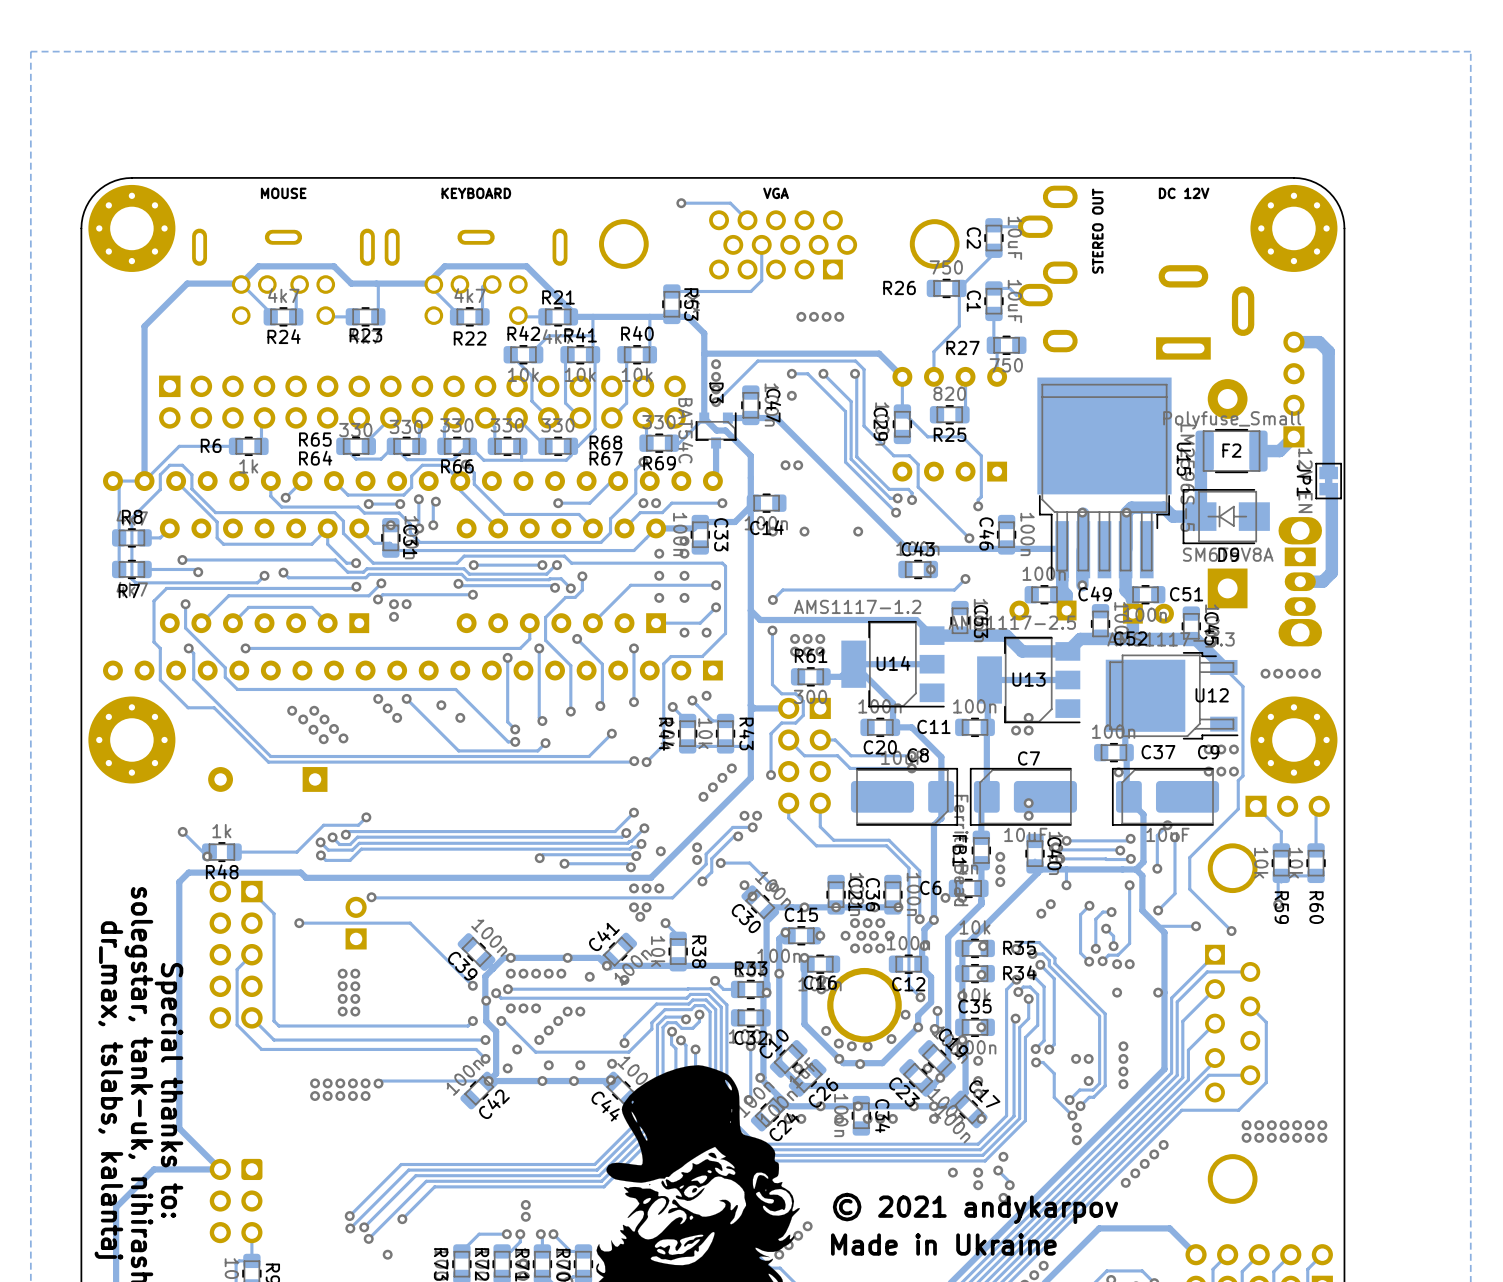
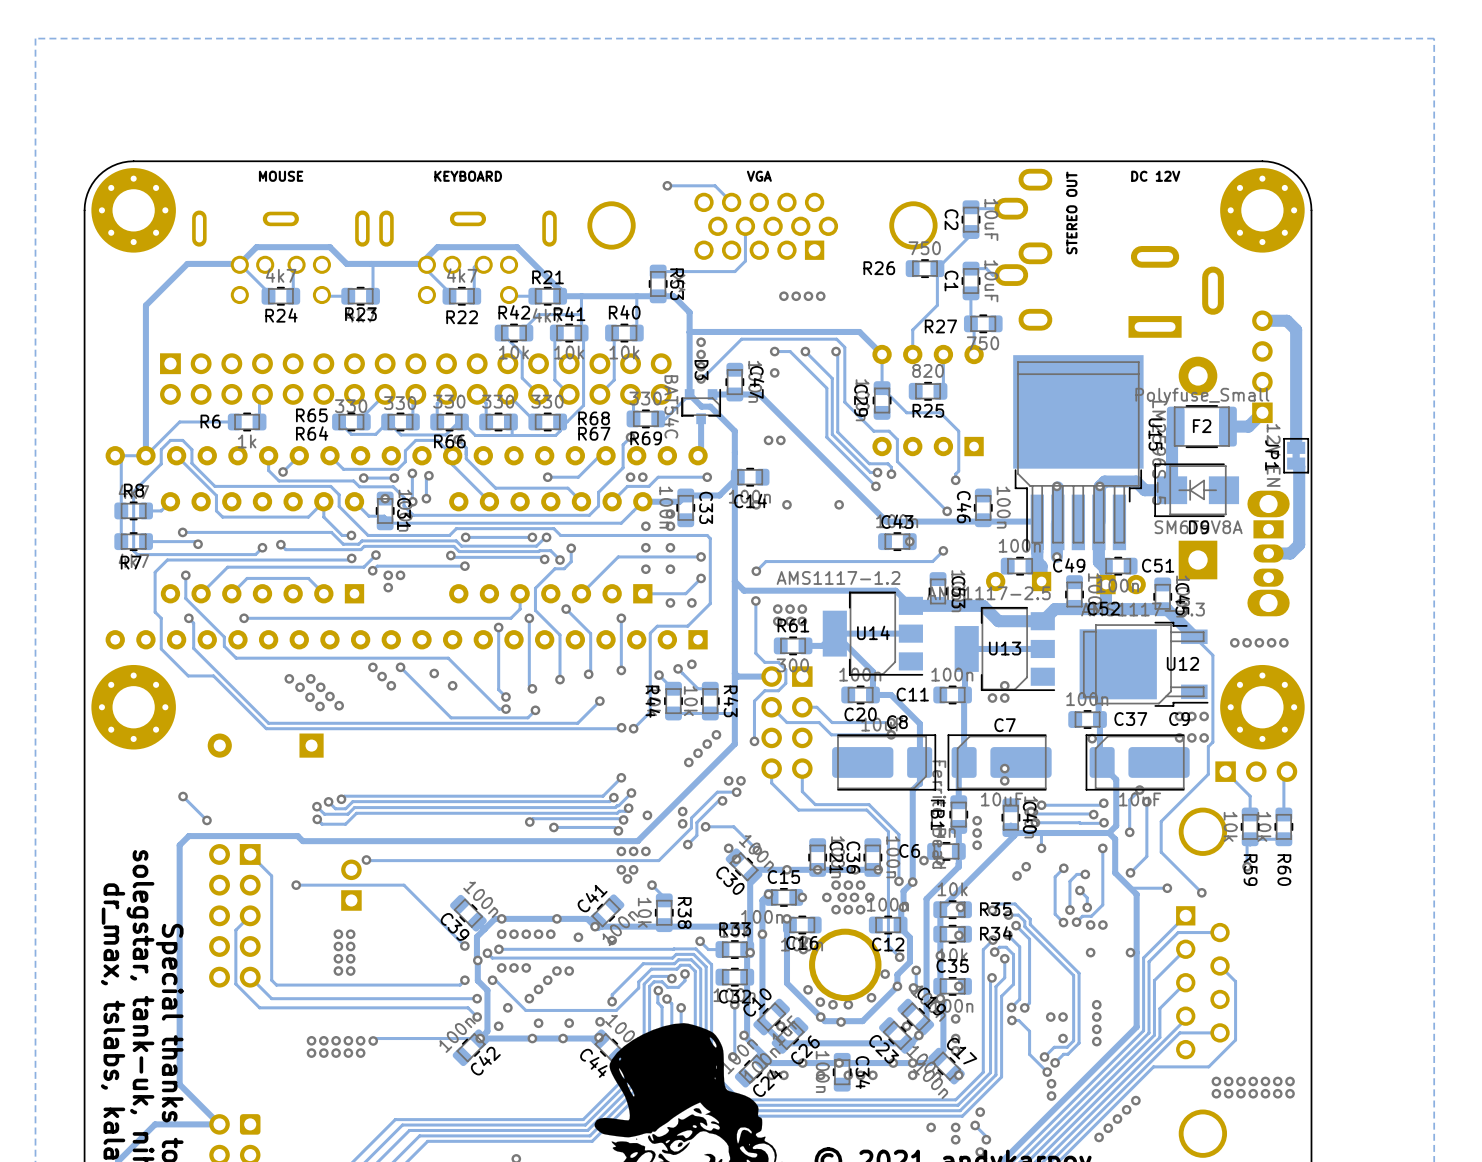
track: (366, 817) (358, 825) (323, 825) (296, 852) (234, 852) -> none
via: (366, 817) -> none
R48: 1k (221, 852) -> none

